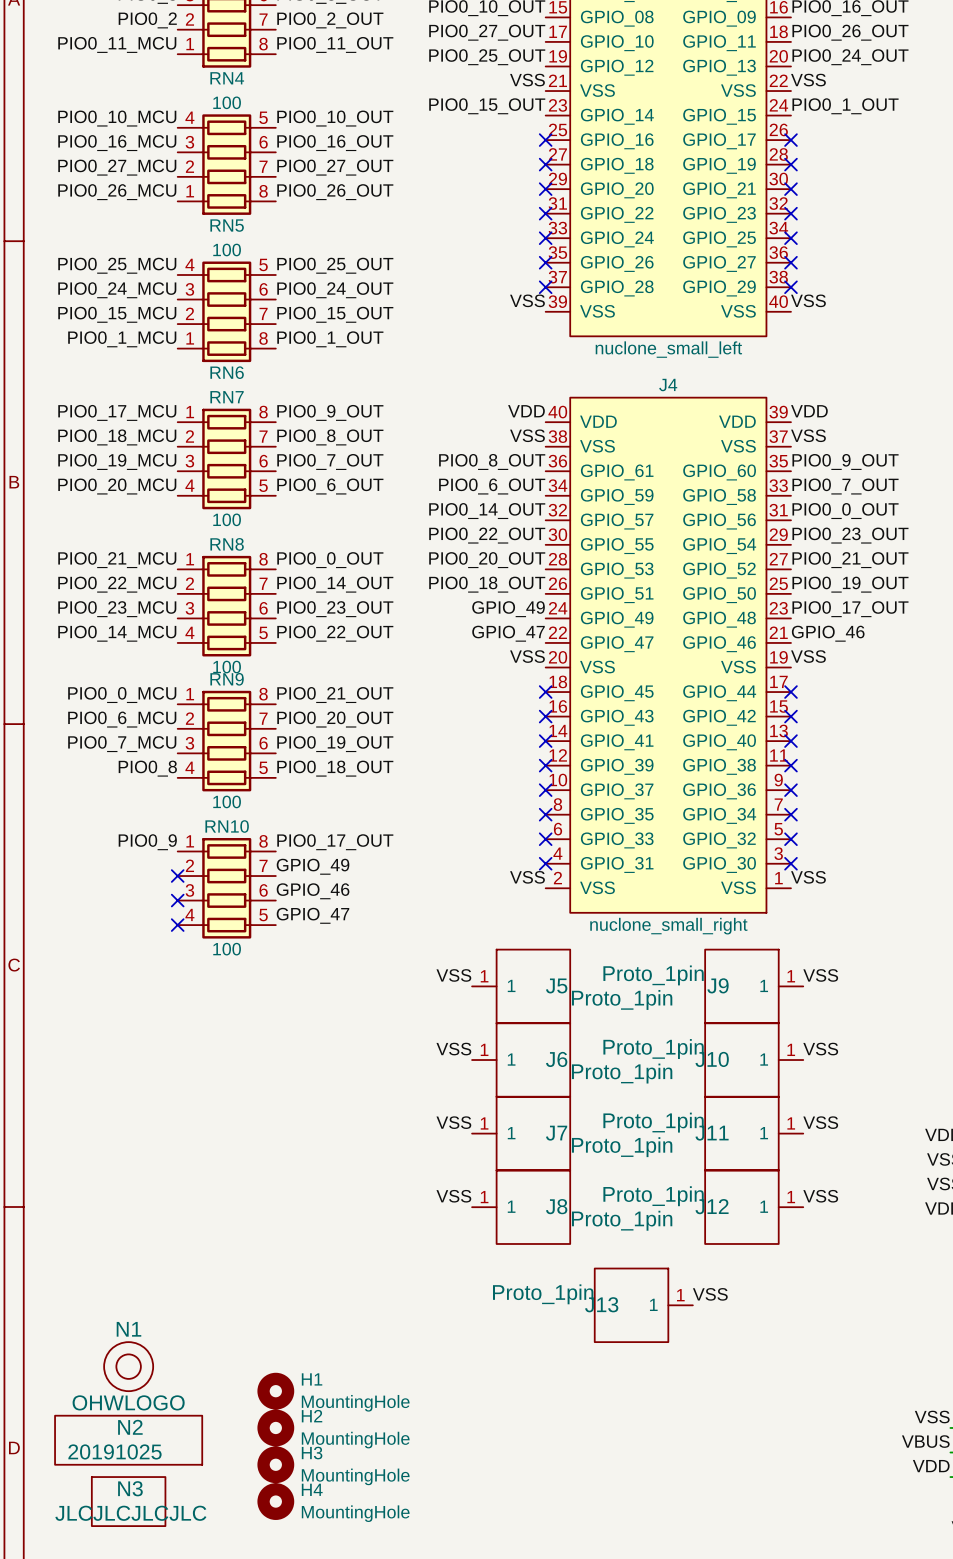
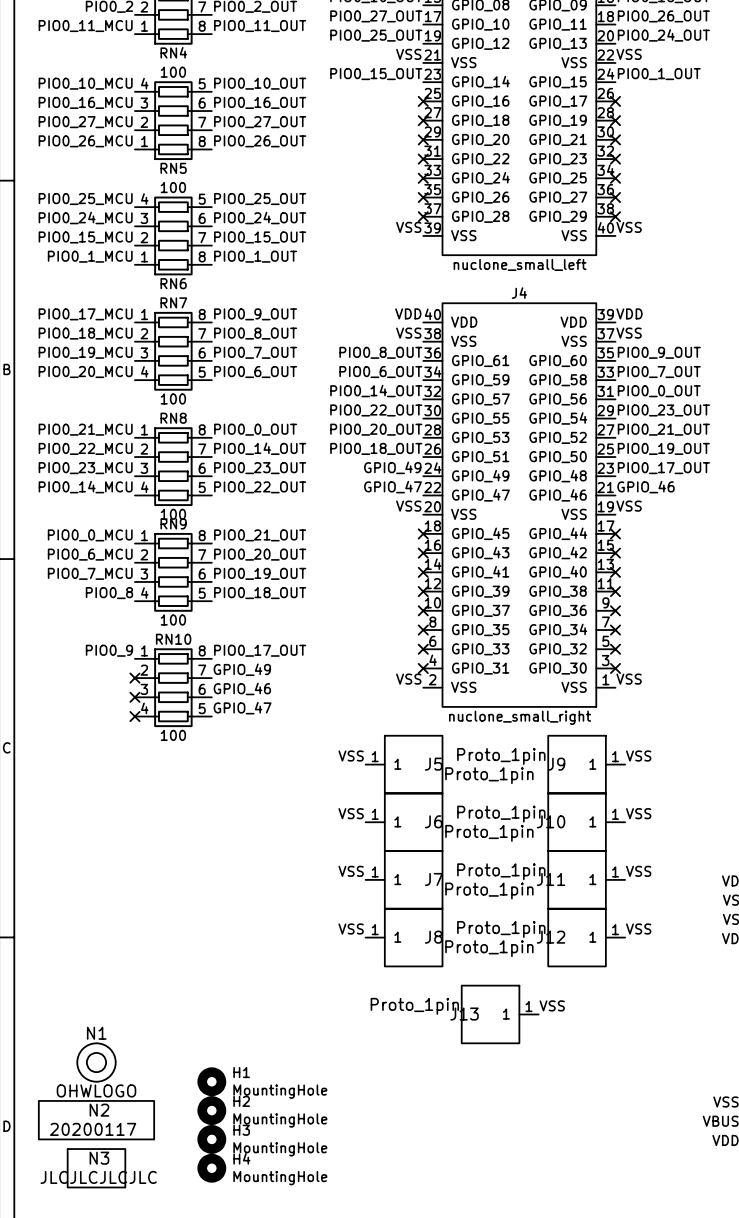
N2 value: 20191025 (114, 1451) -> 20200117 (93, 1129)

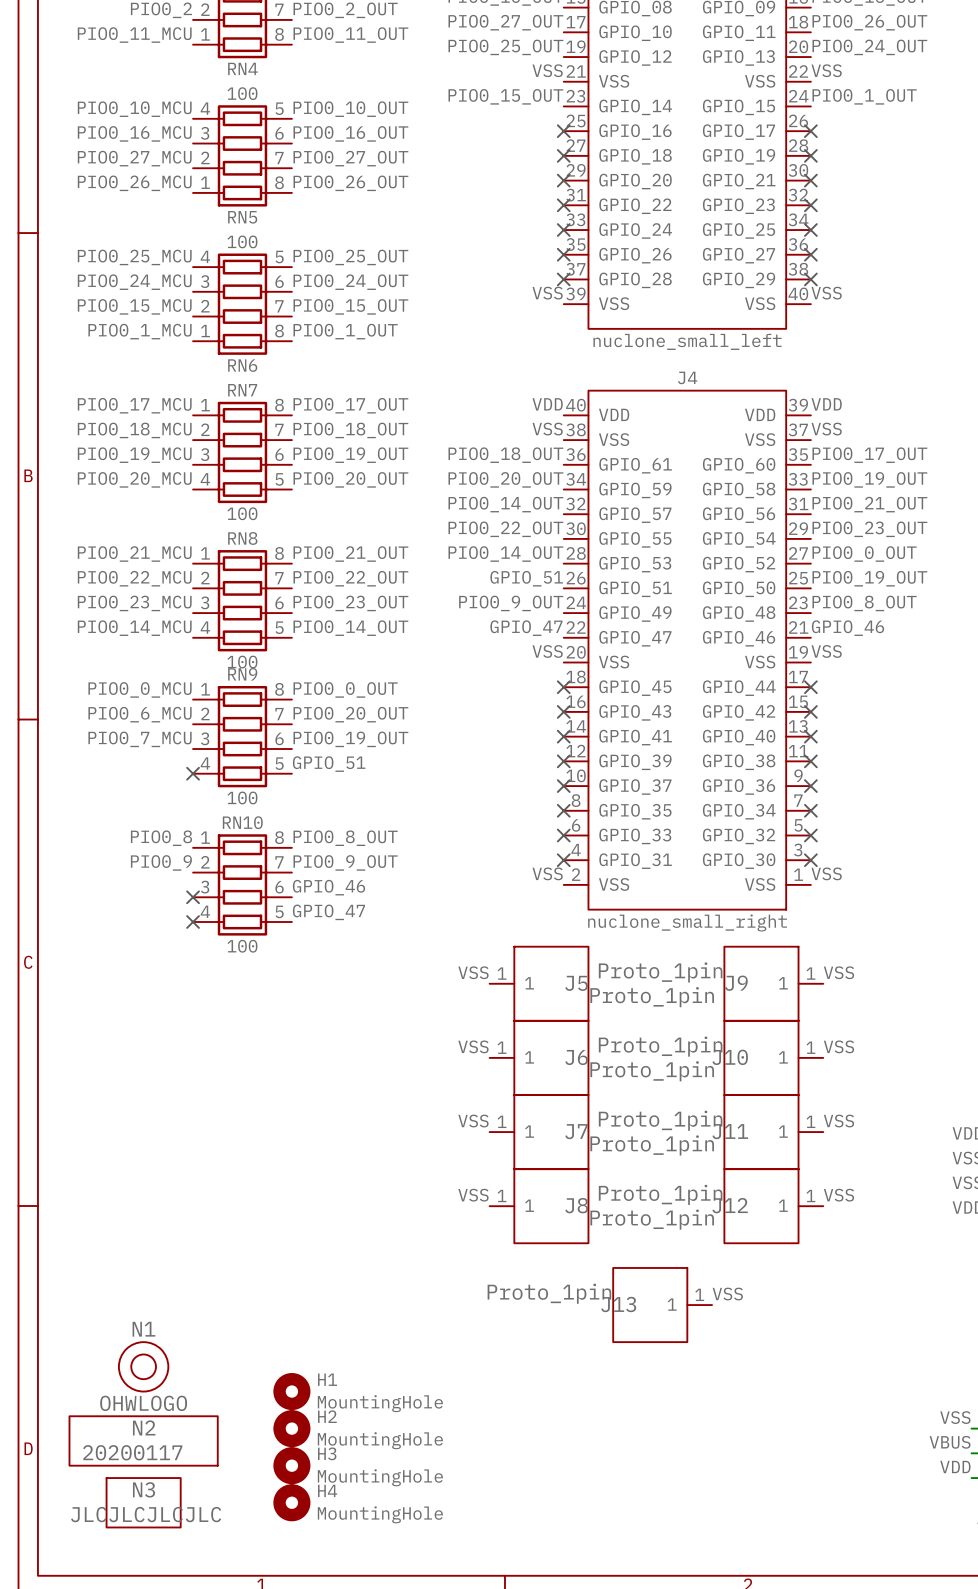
label: PIO0_9_OUT (255, 314) -> PIO0_17_OUT (350, 405)
label: PIO0_8_OUT (255, 333) -> PIO0_18_OUT (350, 430)
label: PIO0_7_OUT (255, 352) -> PIO0_19_OUT (350, 455)
label: PIO0_8_OUT (380, 352) -> PIO0_18_OUT (505, 455)
label: PIO0_9_OUT (659, 352) -> PIO0_17_OUT (869, 455)
label: PIO0_6_OUT (255, 372) -> PIO0_20_OUT (350, 479)
label: PIO0_6_OUT (380, 372) -> PIO0_20_OUT (505, 479)
label: PIO0_7_OUT (659, 372) -> PIO0_19_OUT (869, 479)
label: PIO0_0_OUT (659, 391) -> PIO0_21_OUT (869, 504)
label: PIO0_0_OUT (255, 429) -> PIO0_21_OUT (350, 554)
label: PIO0_20_OUT (376, 429) -> PIO0_14_OUT (505, 554)
label: PIO0_21_OUT (663, 429) -> PIO0_0_OUT (864, 554)
label: PIO0_14_OUT (260, 448) -> PIO0_22_OUT (350, 578)
label: PIO0_18_OUT (376, 448) -> GPIO_51 (526, 578)
label: GPIO_49 (392, 467) -> PIO0_9_OUT (511, 603)
label: PIO0_17_OUT (663, 468) -> PIO0_8_OUT (864, 603)
label: PIO0_22_OUT (260, 487) -> PIO0_14_OUT (350, 628)
label: PIO0_21_OUT (260, 535) -> PIO0_0_OUT (345, 689)
label: PIO0_8 (109, 593) -> none
label: PIO0_18_OUT (260, 593) -> GPIO_51 (329, 764)
no-connect mark: none -> (193, 773)
label: PIO0_9 (109, 650) -> PIO0_8 (161, 838)
label: PIO0_17_OUT (260, 650) -> PIO0_8_OUT (345, 838)
label: none -> PIO0_9 (161, 862)
label: GPIO_49 (242, 669) -> PIO0_9_OUT (345, 862)
no-connect mark: (134, 678) -> none

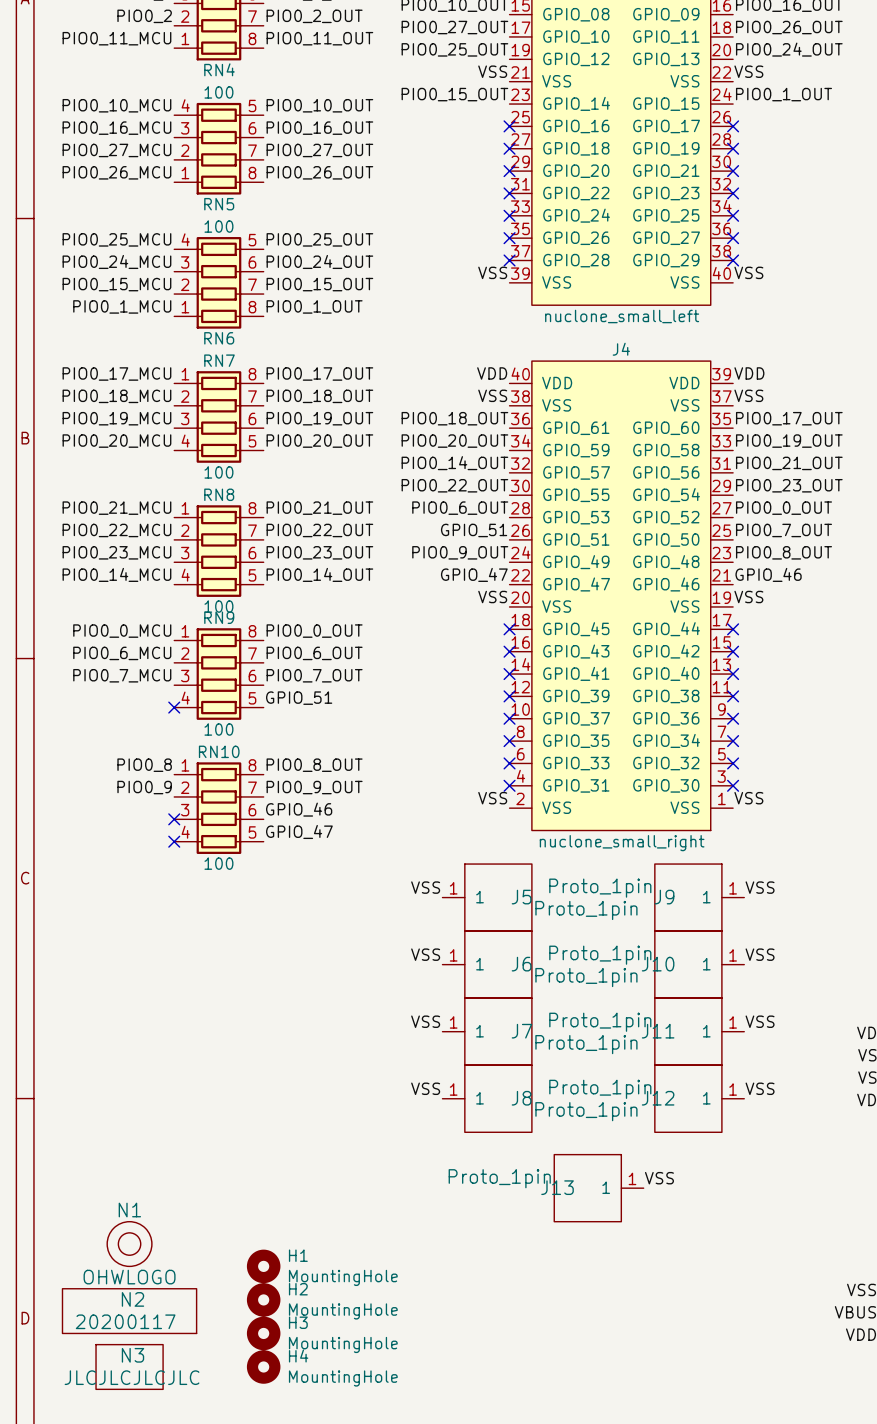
label: PIO0_14_OUT (505, 554) -> PIO0_6_OUT (460, 508)
label: PIO0_19_OUT (869, 578) -> PIO0_7_OUT (783, 530)
label: PIO0_20_OUT (350, 714) -> PIO0_6_OUT (314, 653)
label: PIO0_19_OUT (350, 739) -> PIO0_7_OUT (314, 675)

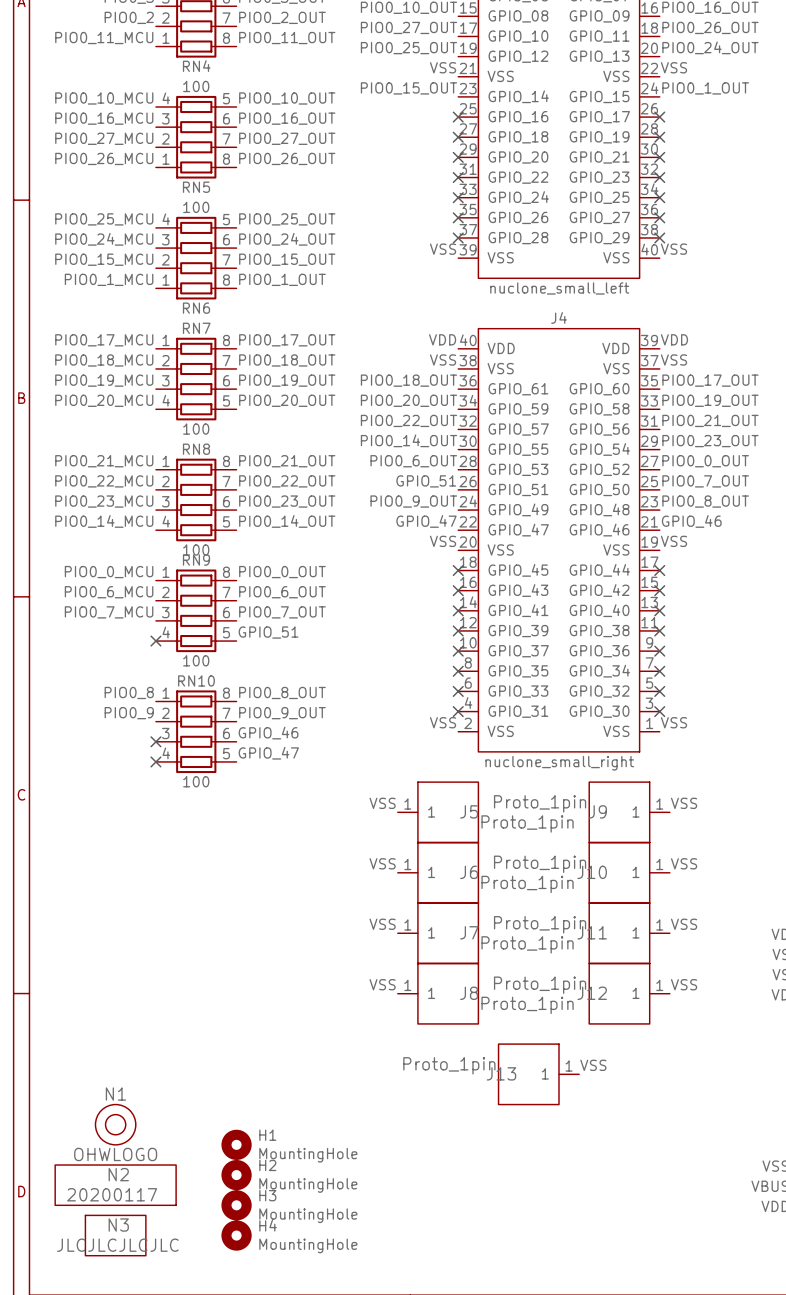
label: PIO0_14_OUT (454, 463) -> PIO0_22_OUT (408, 420)
label: PIO0_22_OUT (454, 485) -> PIO0_14_OUT (408, 440)

